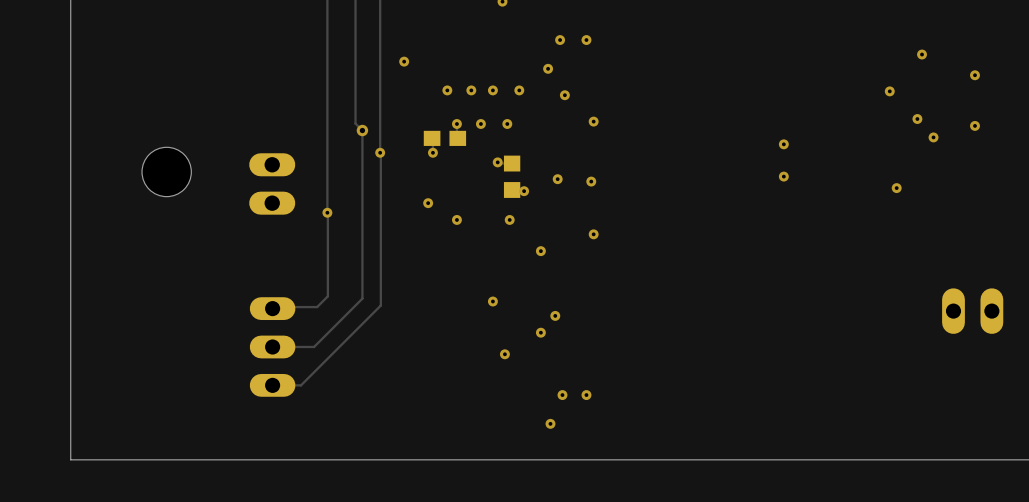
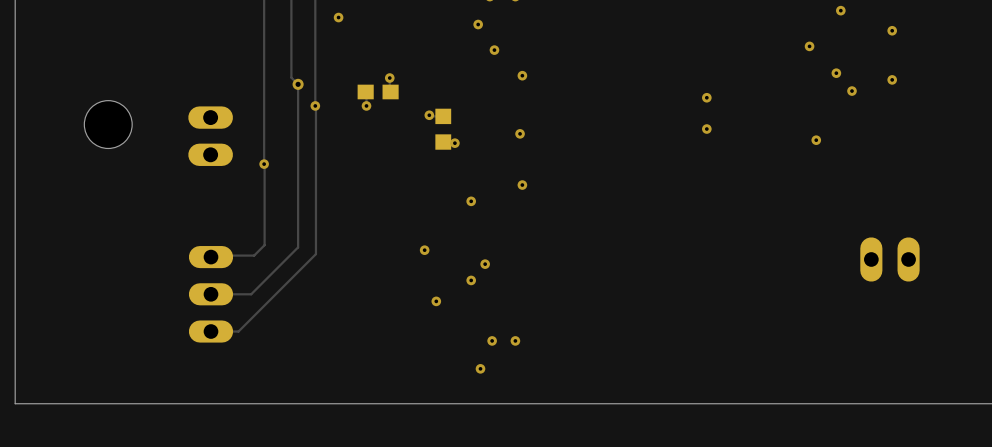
via: (447, 90) -> none
via: (471, 90) -> none
via: (492, 90) -> none
via: (519, 90) -> none
via: (480, 123) -> none
via: (507, 123) -> none
via: (557, 179) -> none
via: (428, 203) -> none
via: (456, 219) -> none
via: (509, 219) -> none

